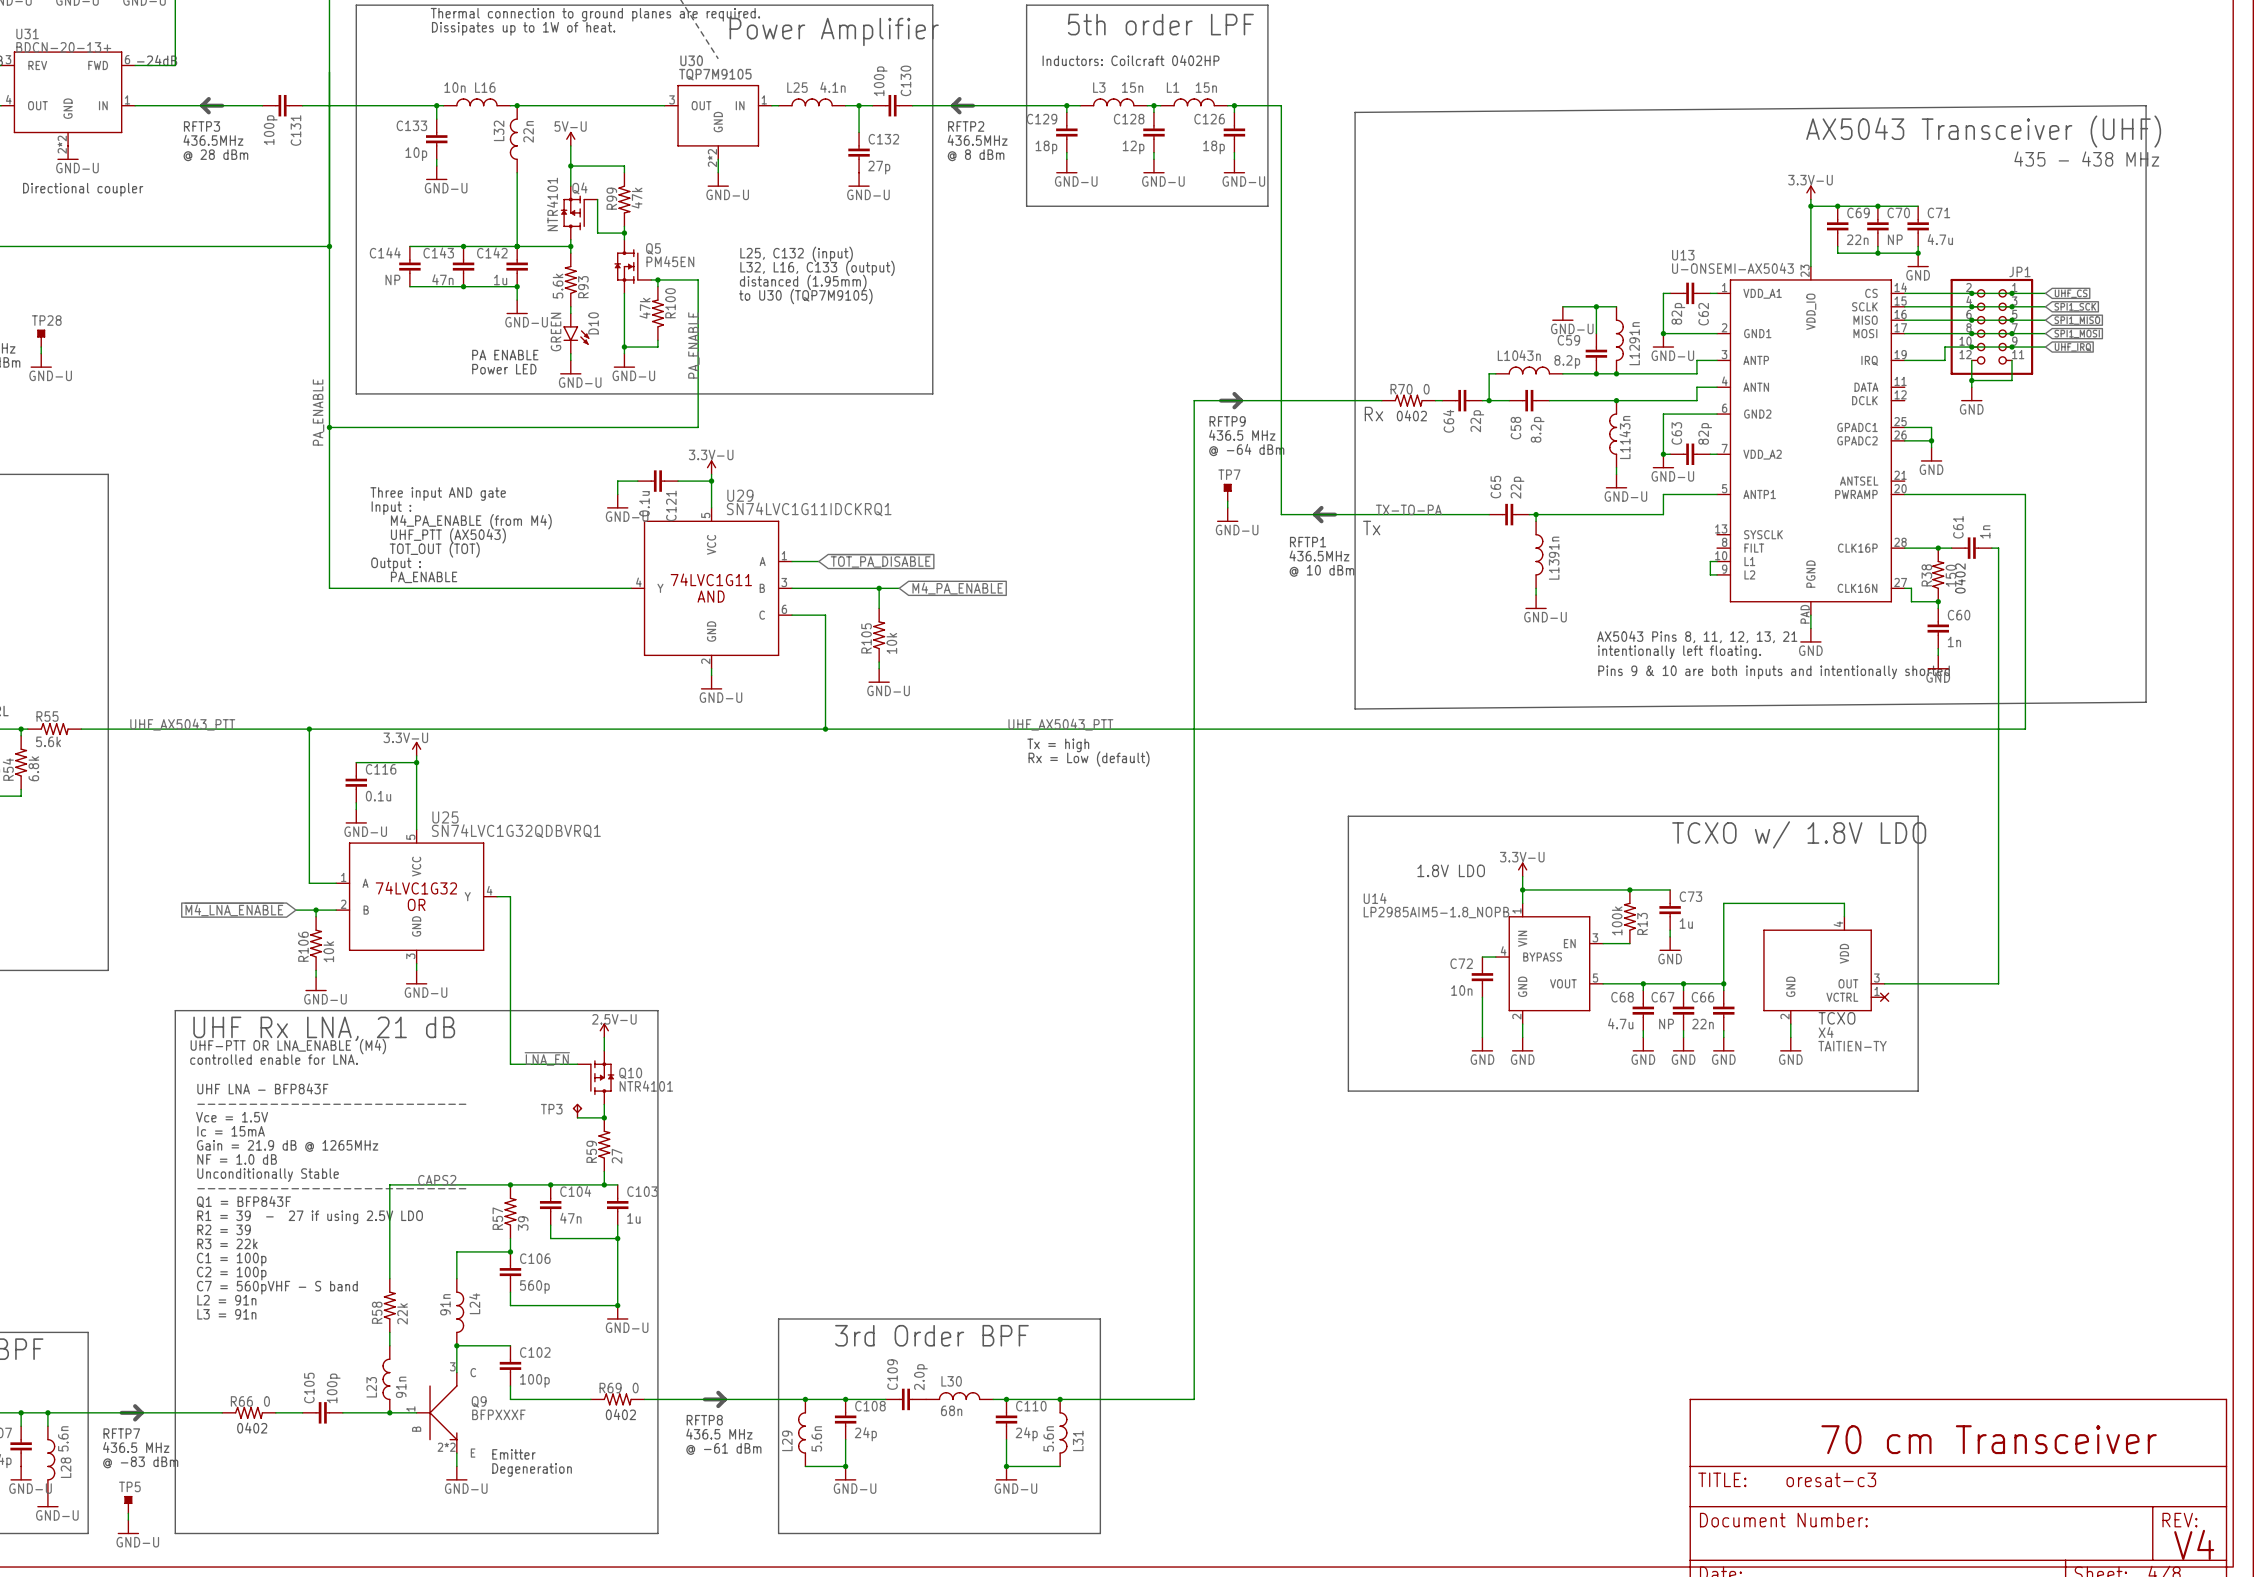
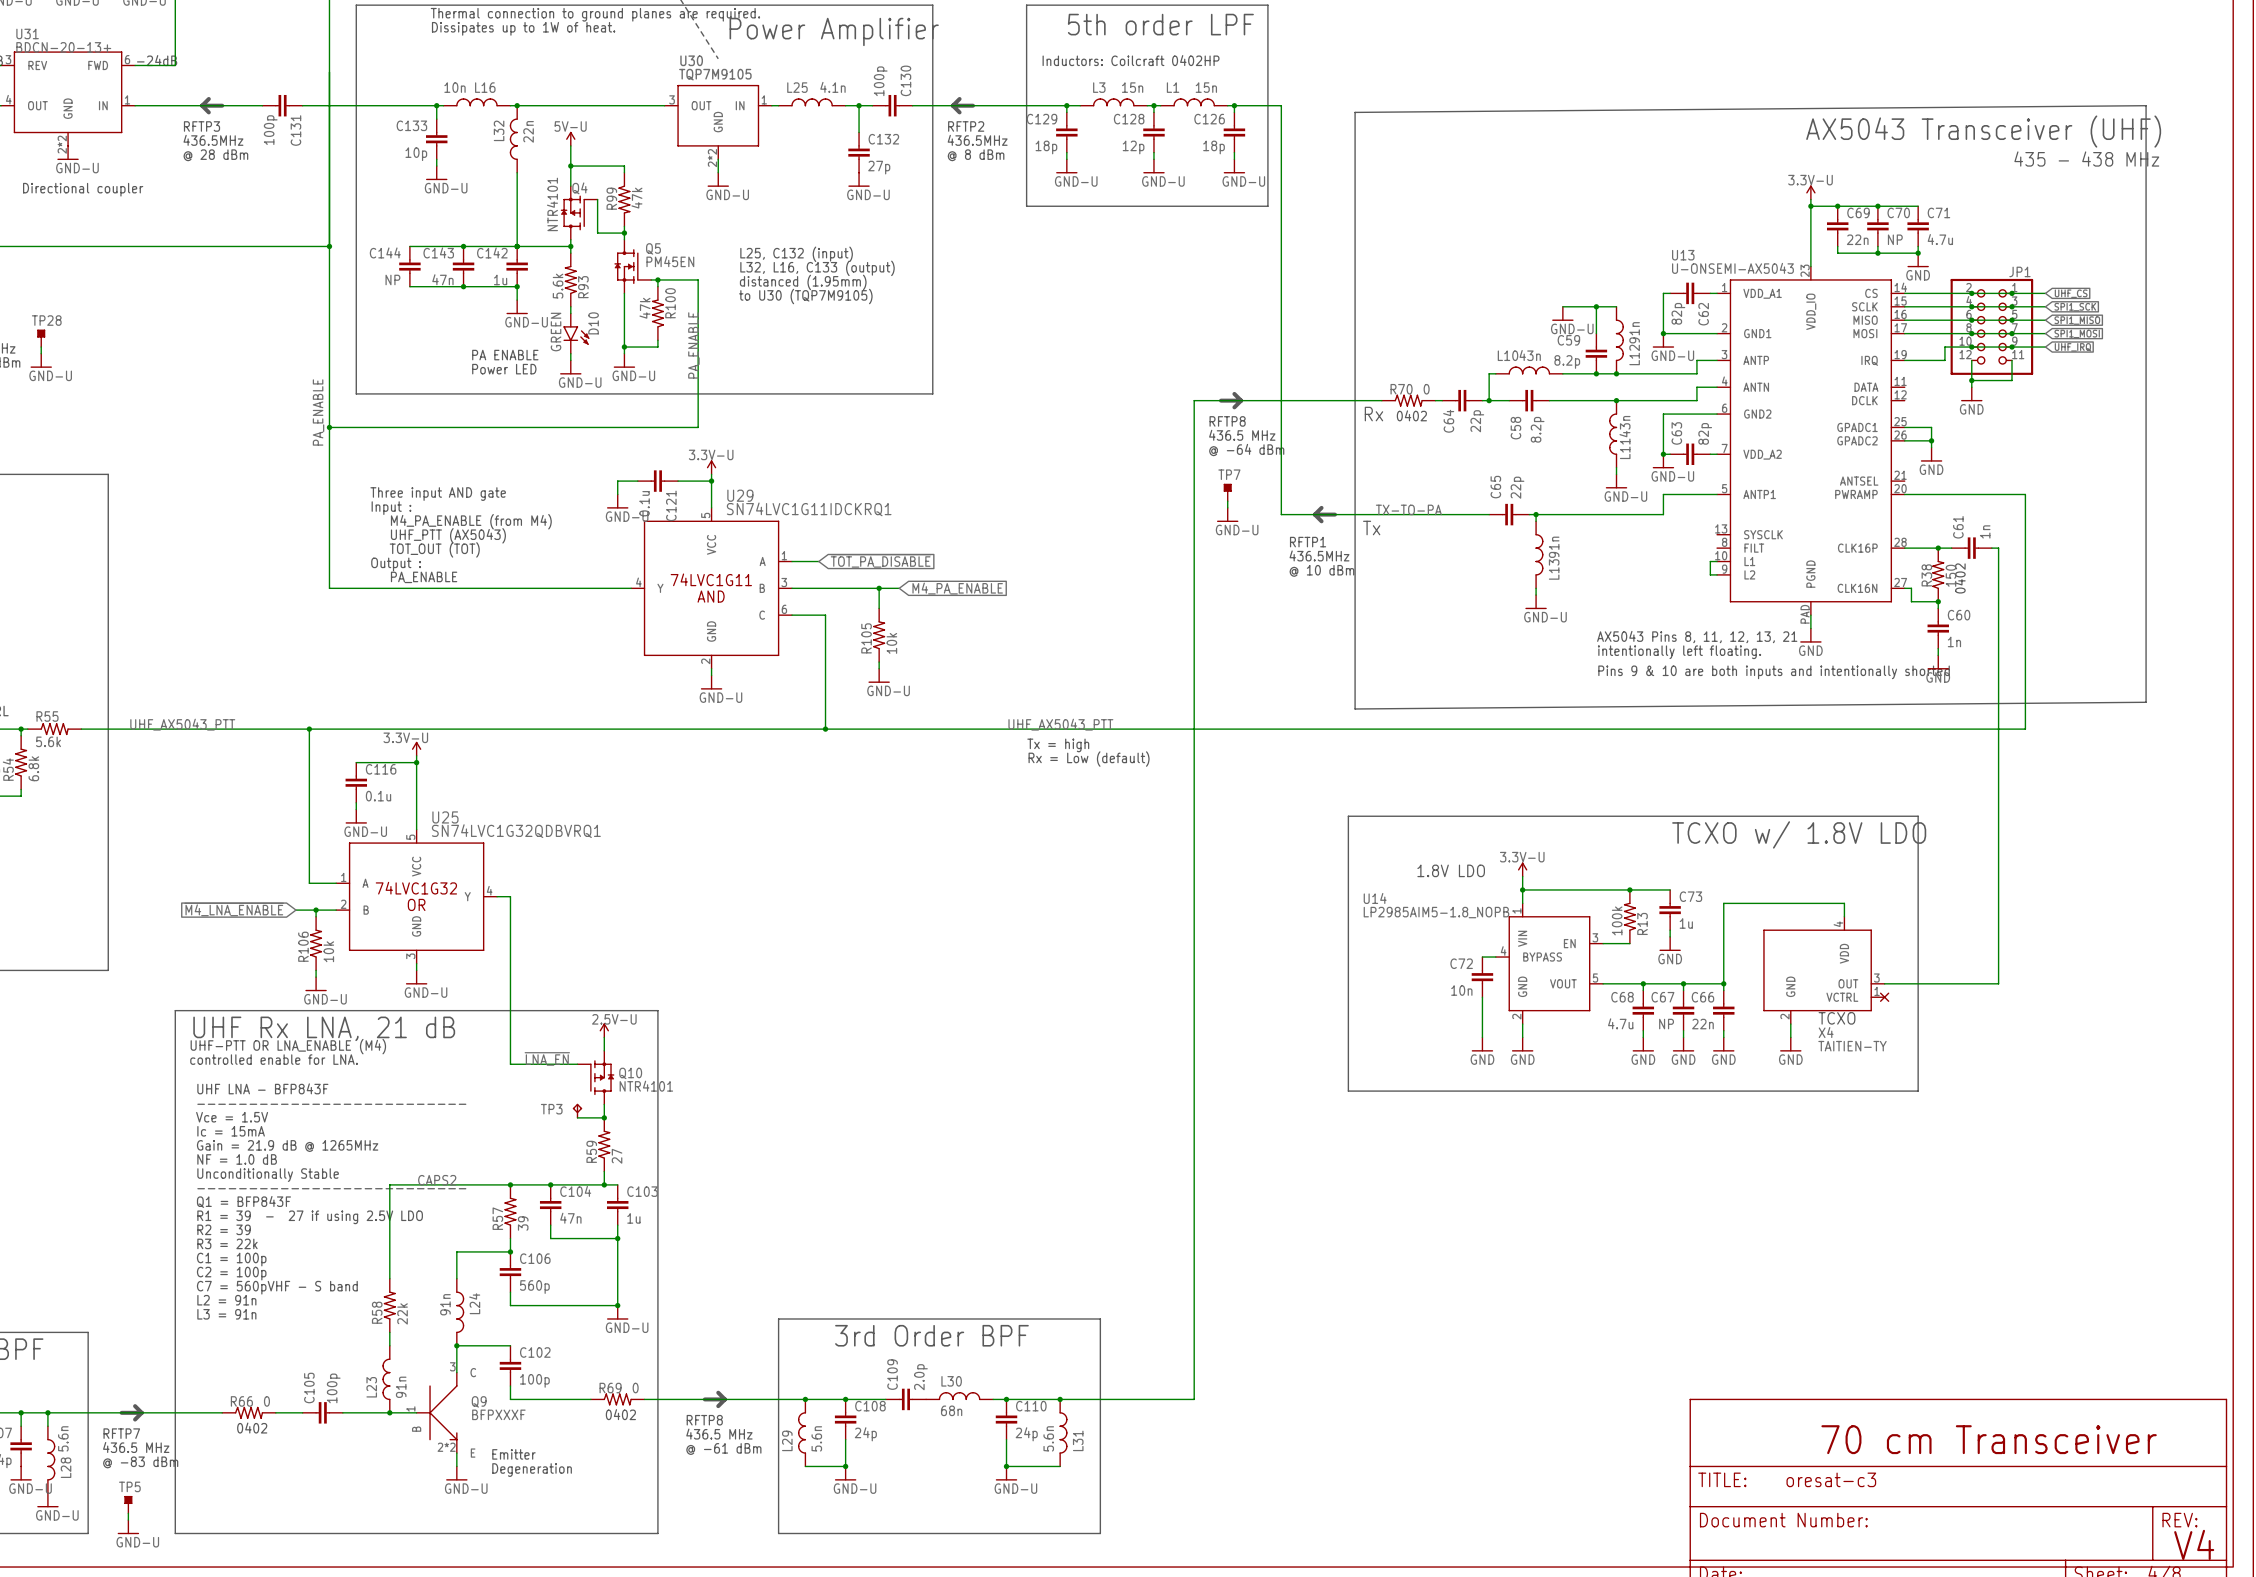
text: RFTP9 (1227, 421) -> RFTP8 (1227, 421)

